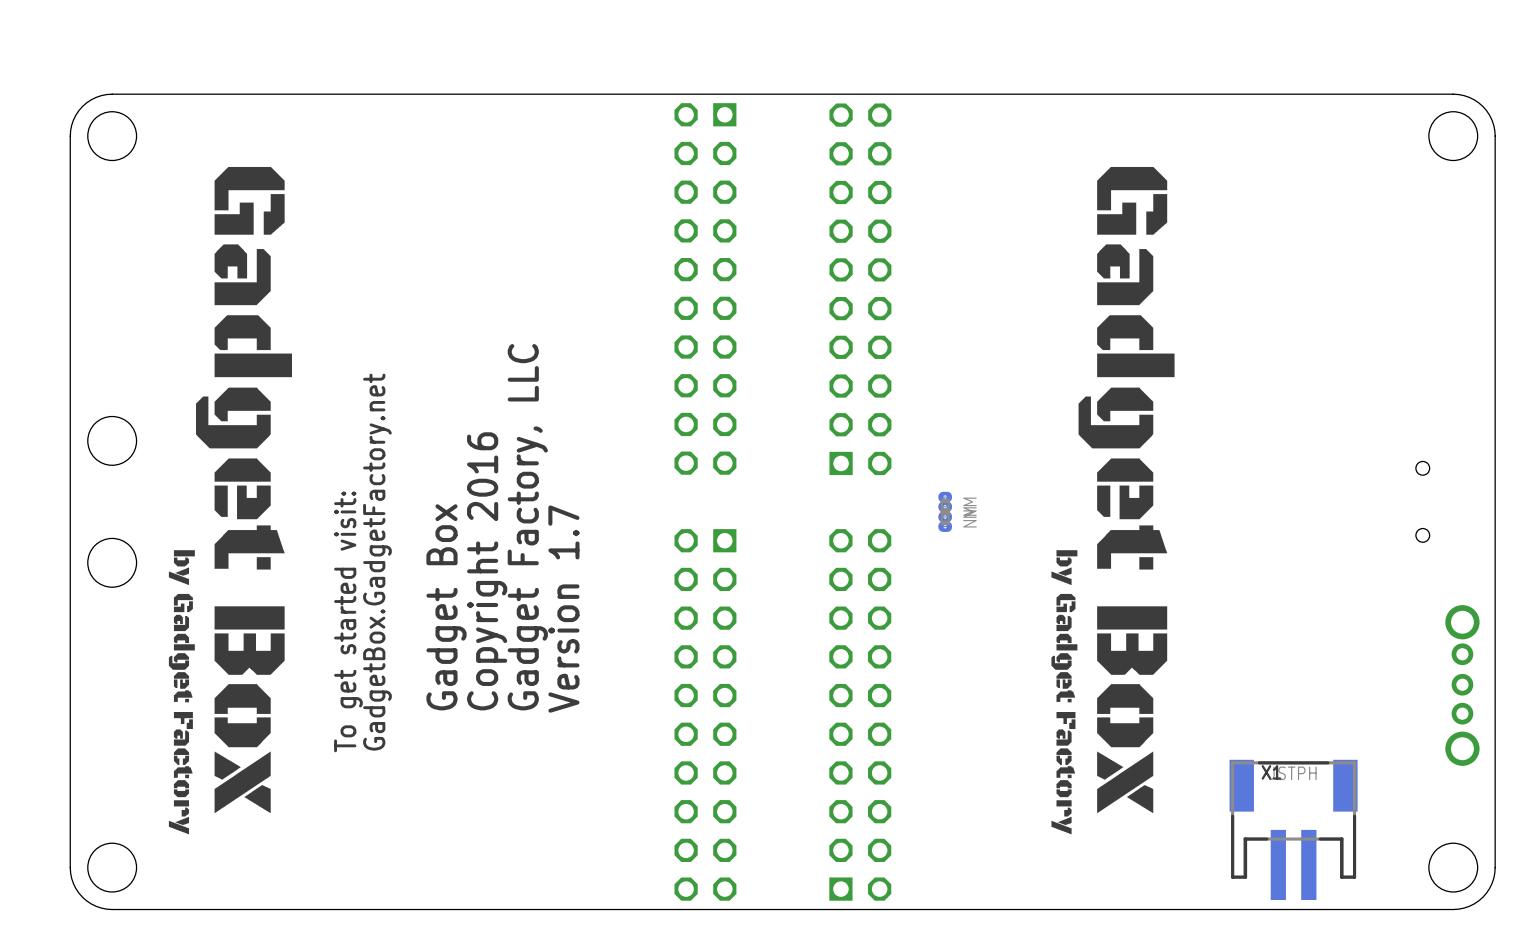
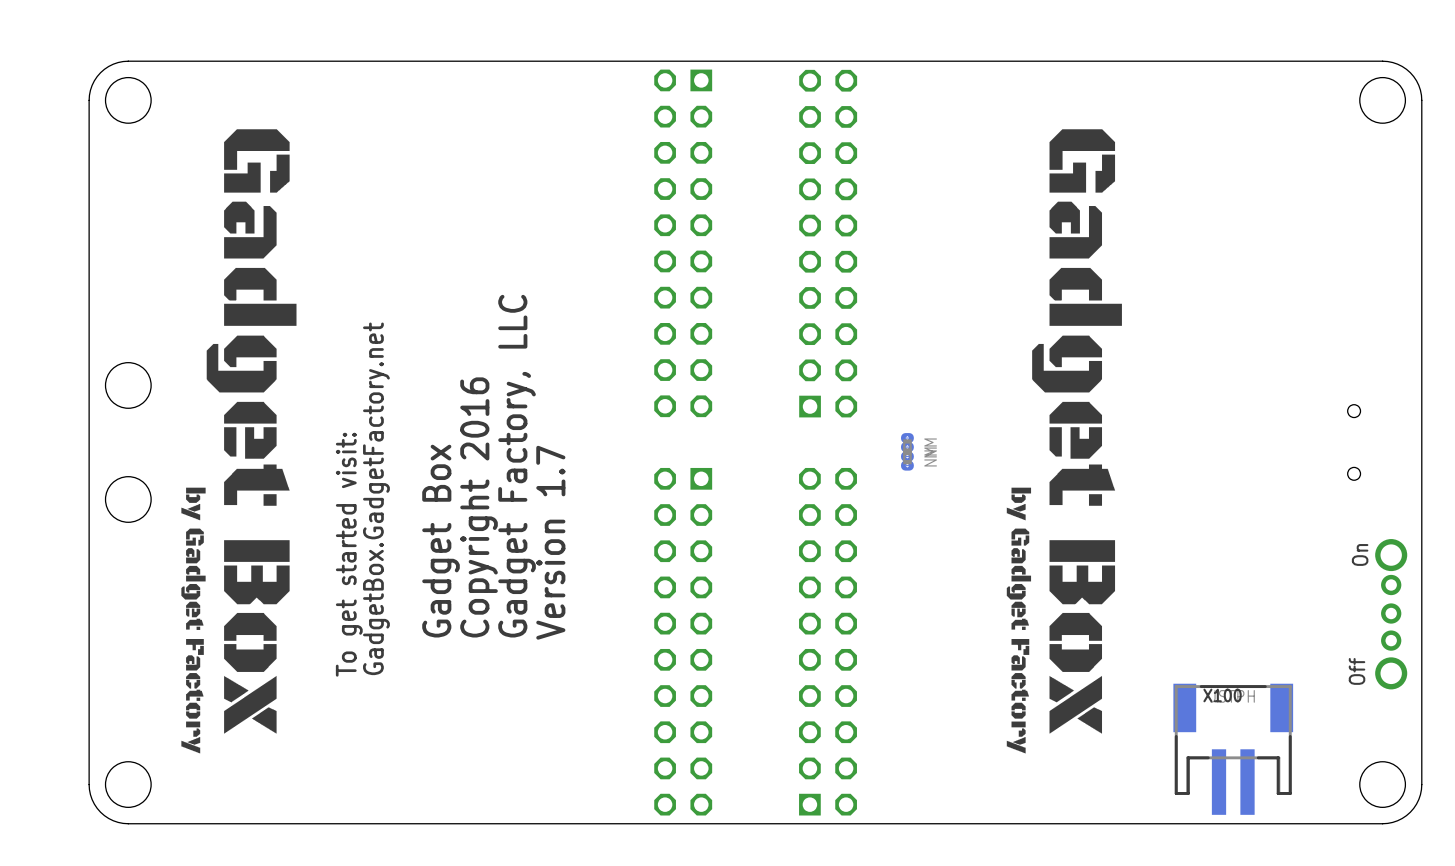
text: none -> On (1360, 554)
text: none -> Off (1357, 671)
X1 name: X1 (1271, 772) -> X100 (1222, 695)

